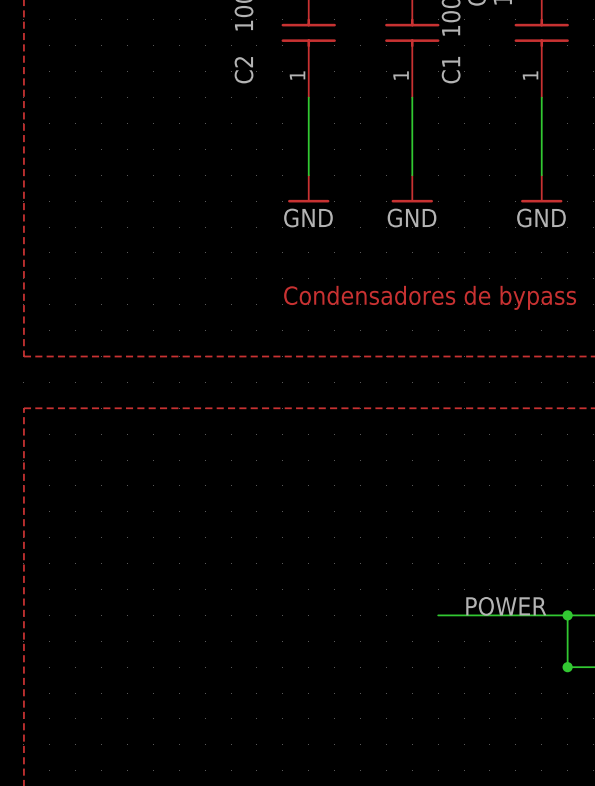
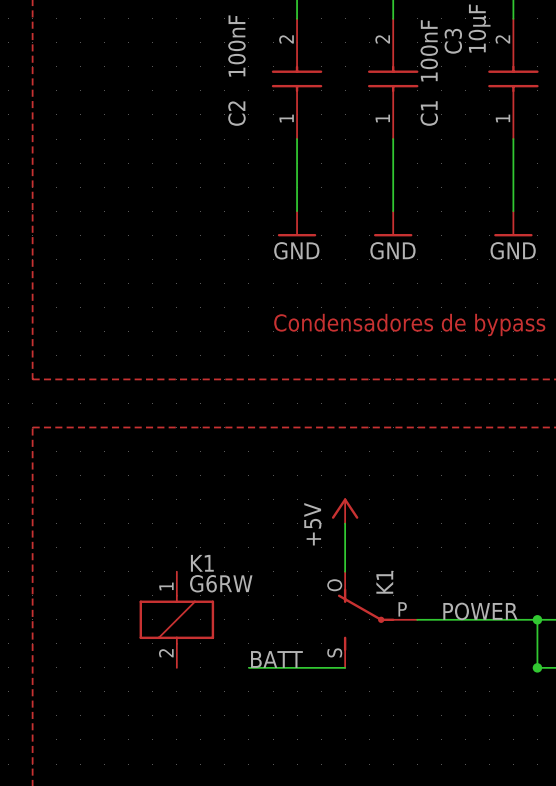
power symbol: none -> +5V (345, 511)
wire: none -> (345, 523) (345, 571)
K1: none -> G6RW (176, 619)
K1: none -> (377, 619)
label: none -> BATT (276, 659)
wire: none -> (248, 667) (345, 667)

